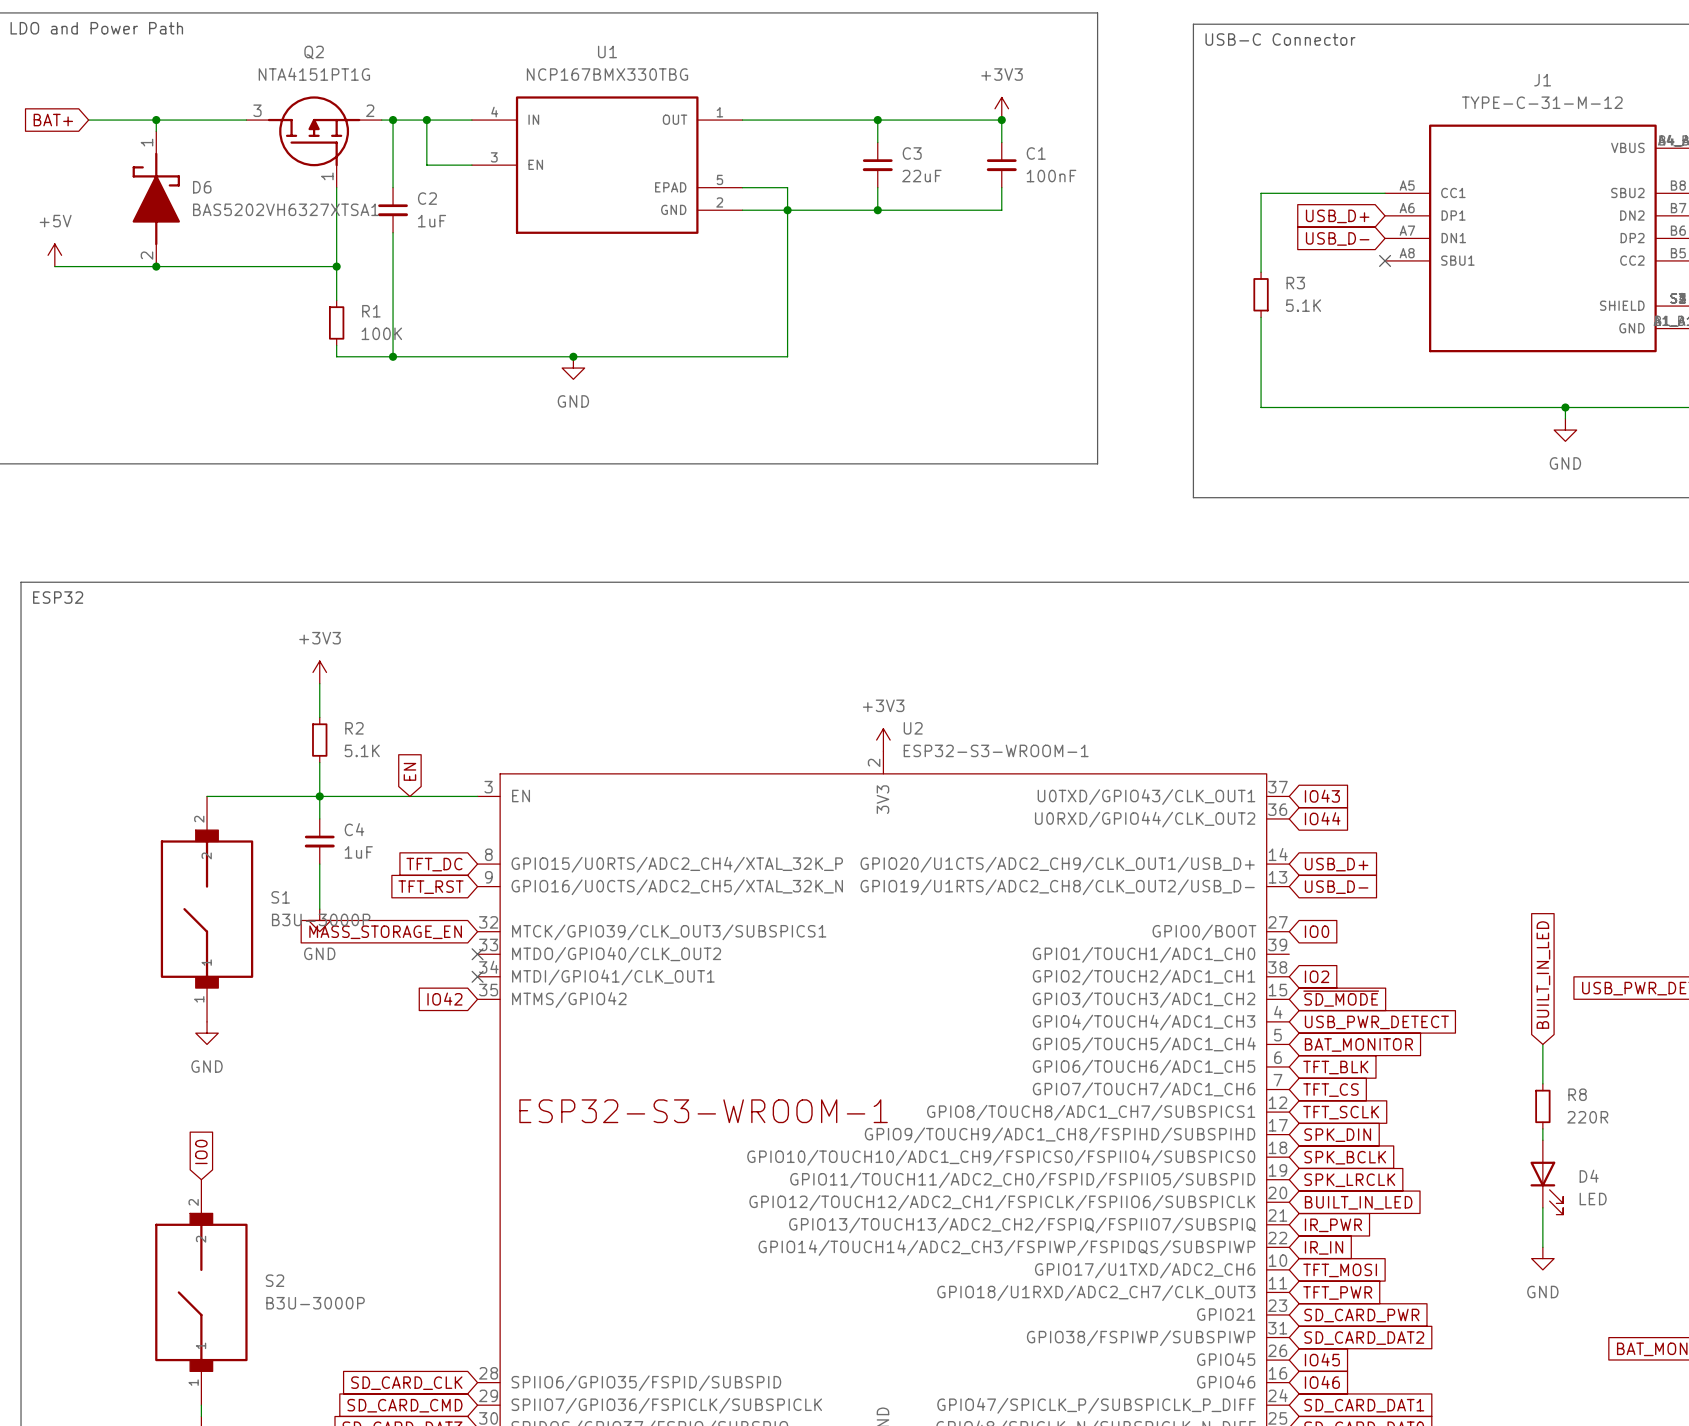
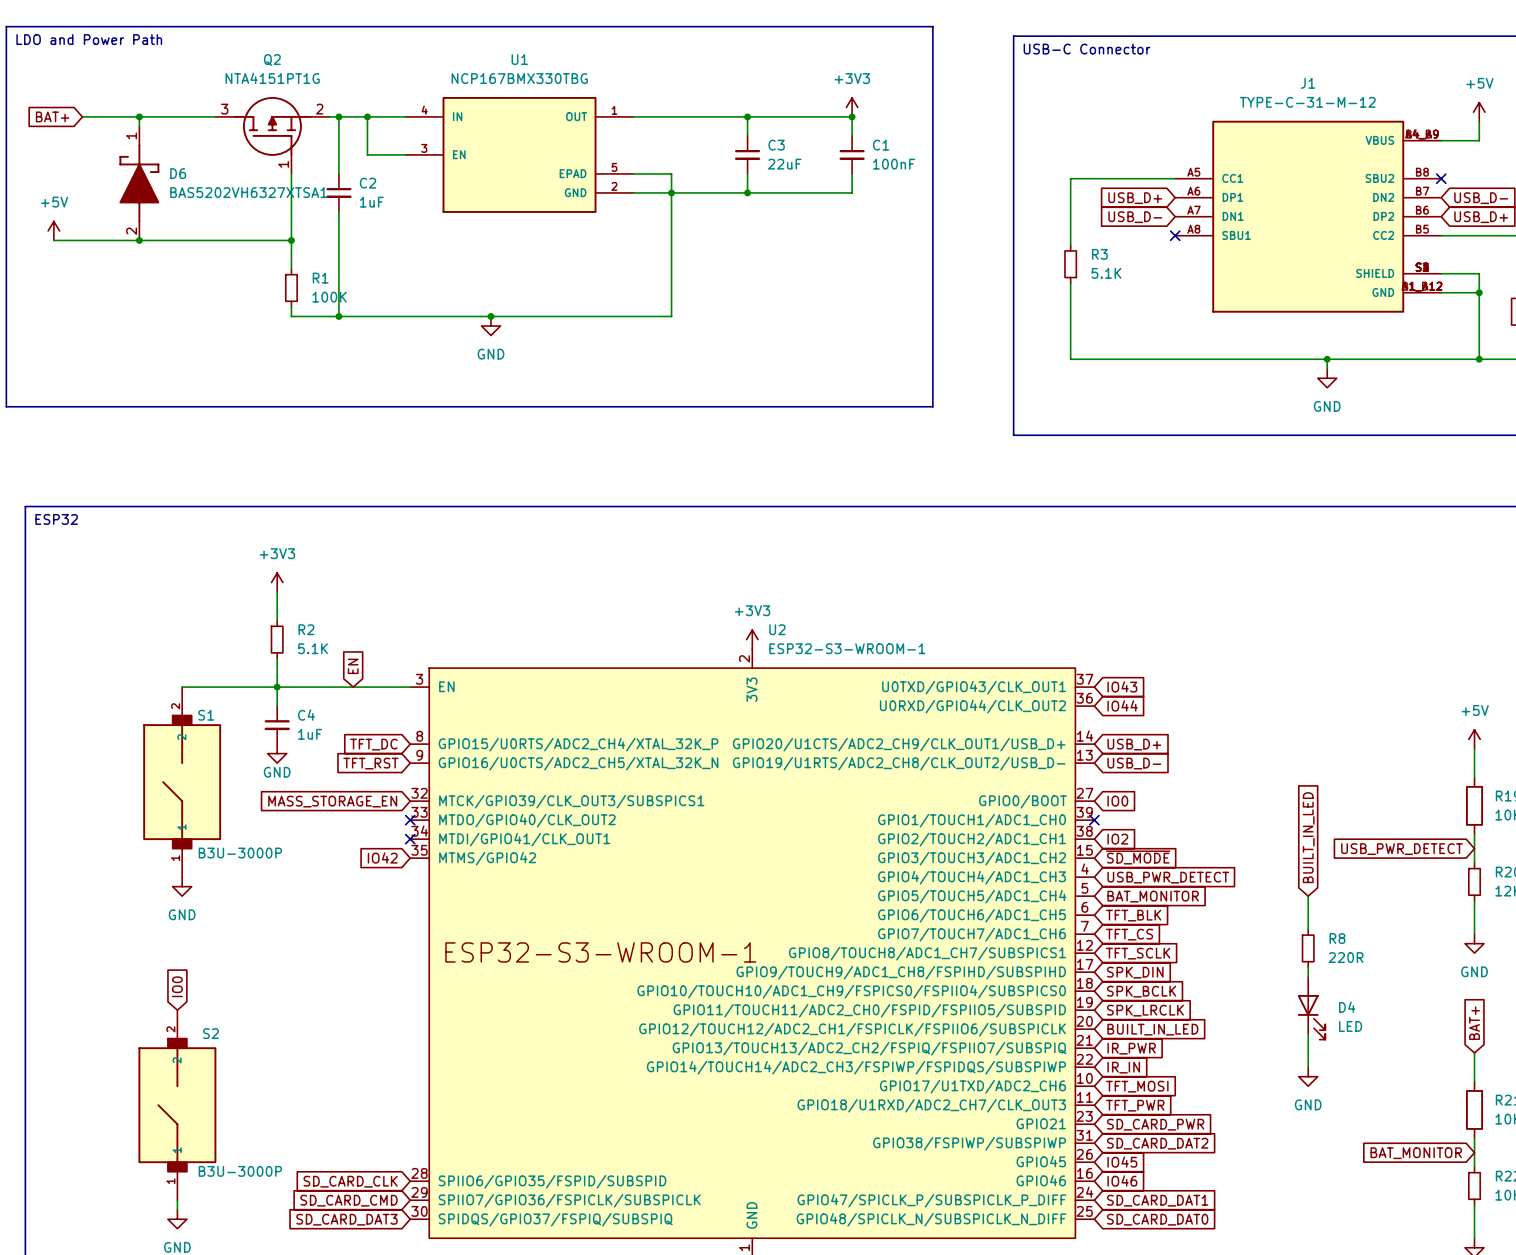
wire: (319, 864) (319, 909) -> none
S1 name position: S1 (280, 897) -> S1 (206, 715)
S1 value position: B3U-3000P (321, 919) -> B3U-3000P (240, 853)
power symbol position: GND (319, 920) -> GND (277, 753)
power symbol text position: GND (319, 953) -> GND (277, 772)
no-connect mark: none -> (1094, 820)
S2 name position: S2 (275, 1280) -> S2 (210, 1033)
S2 value position: B3U-3000P (315, 1303) -> B3U-3000P (240, 1171)

